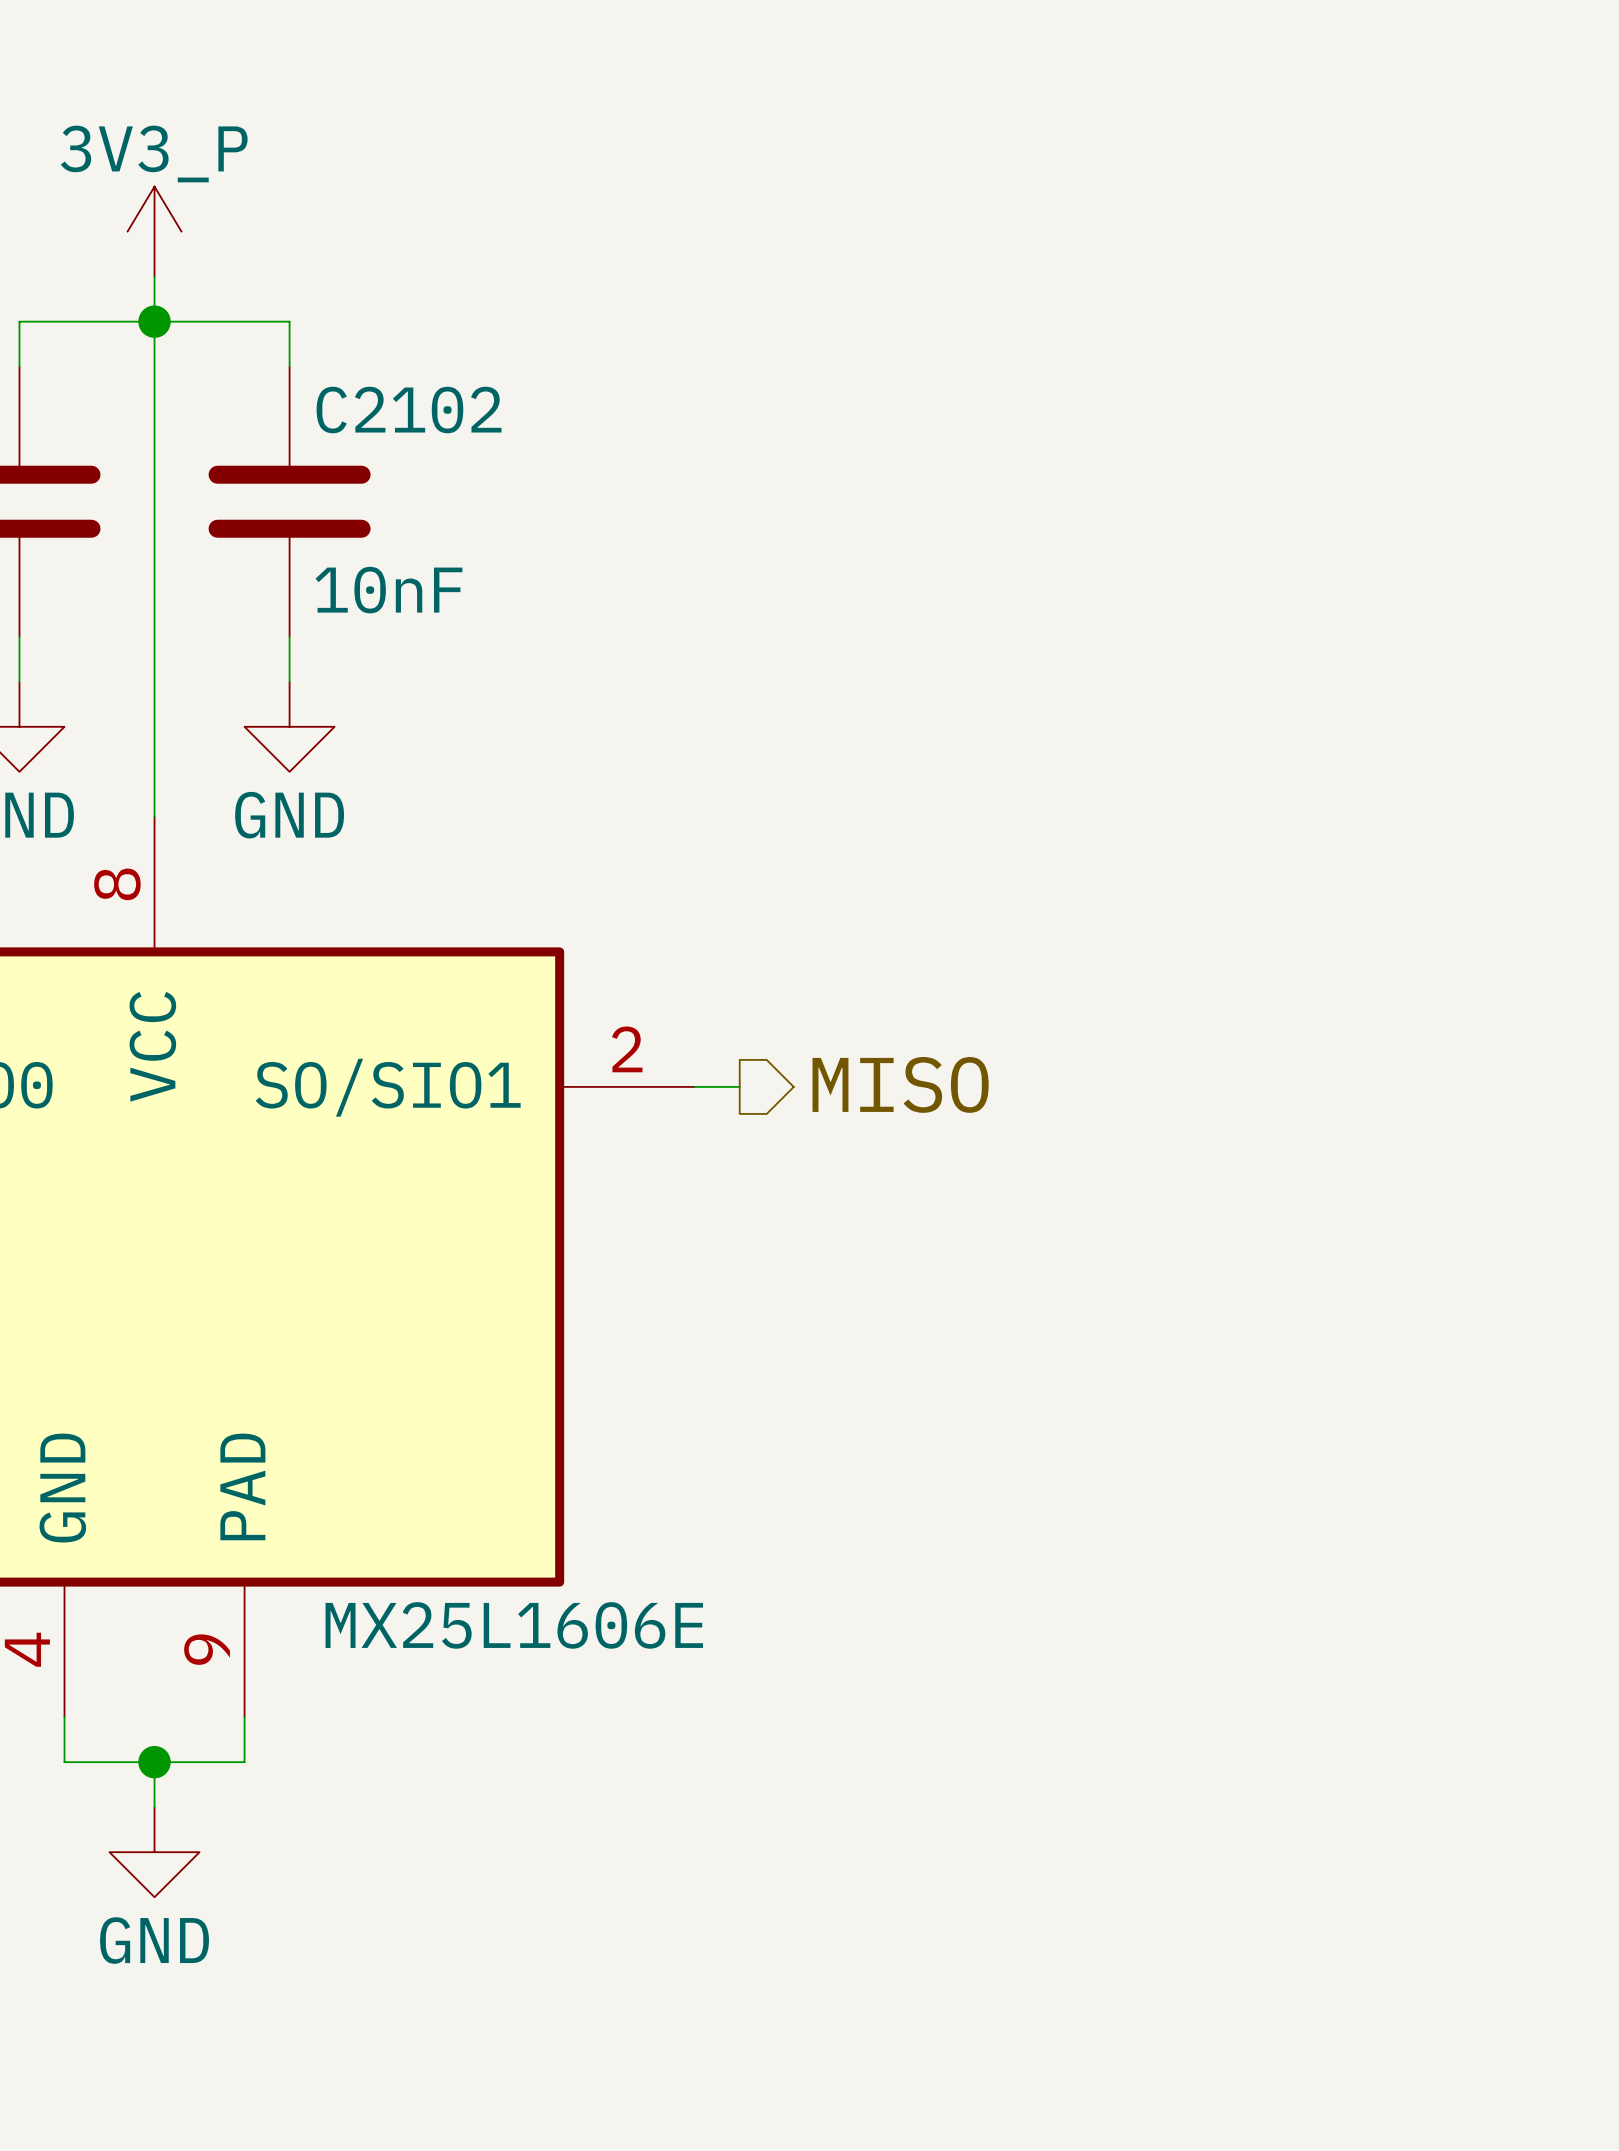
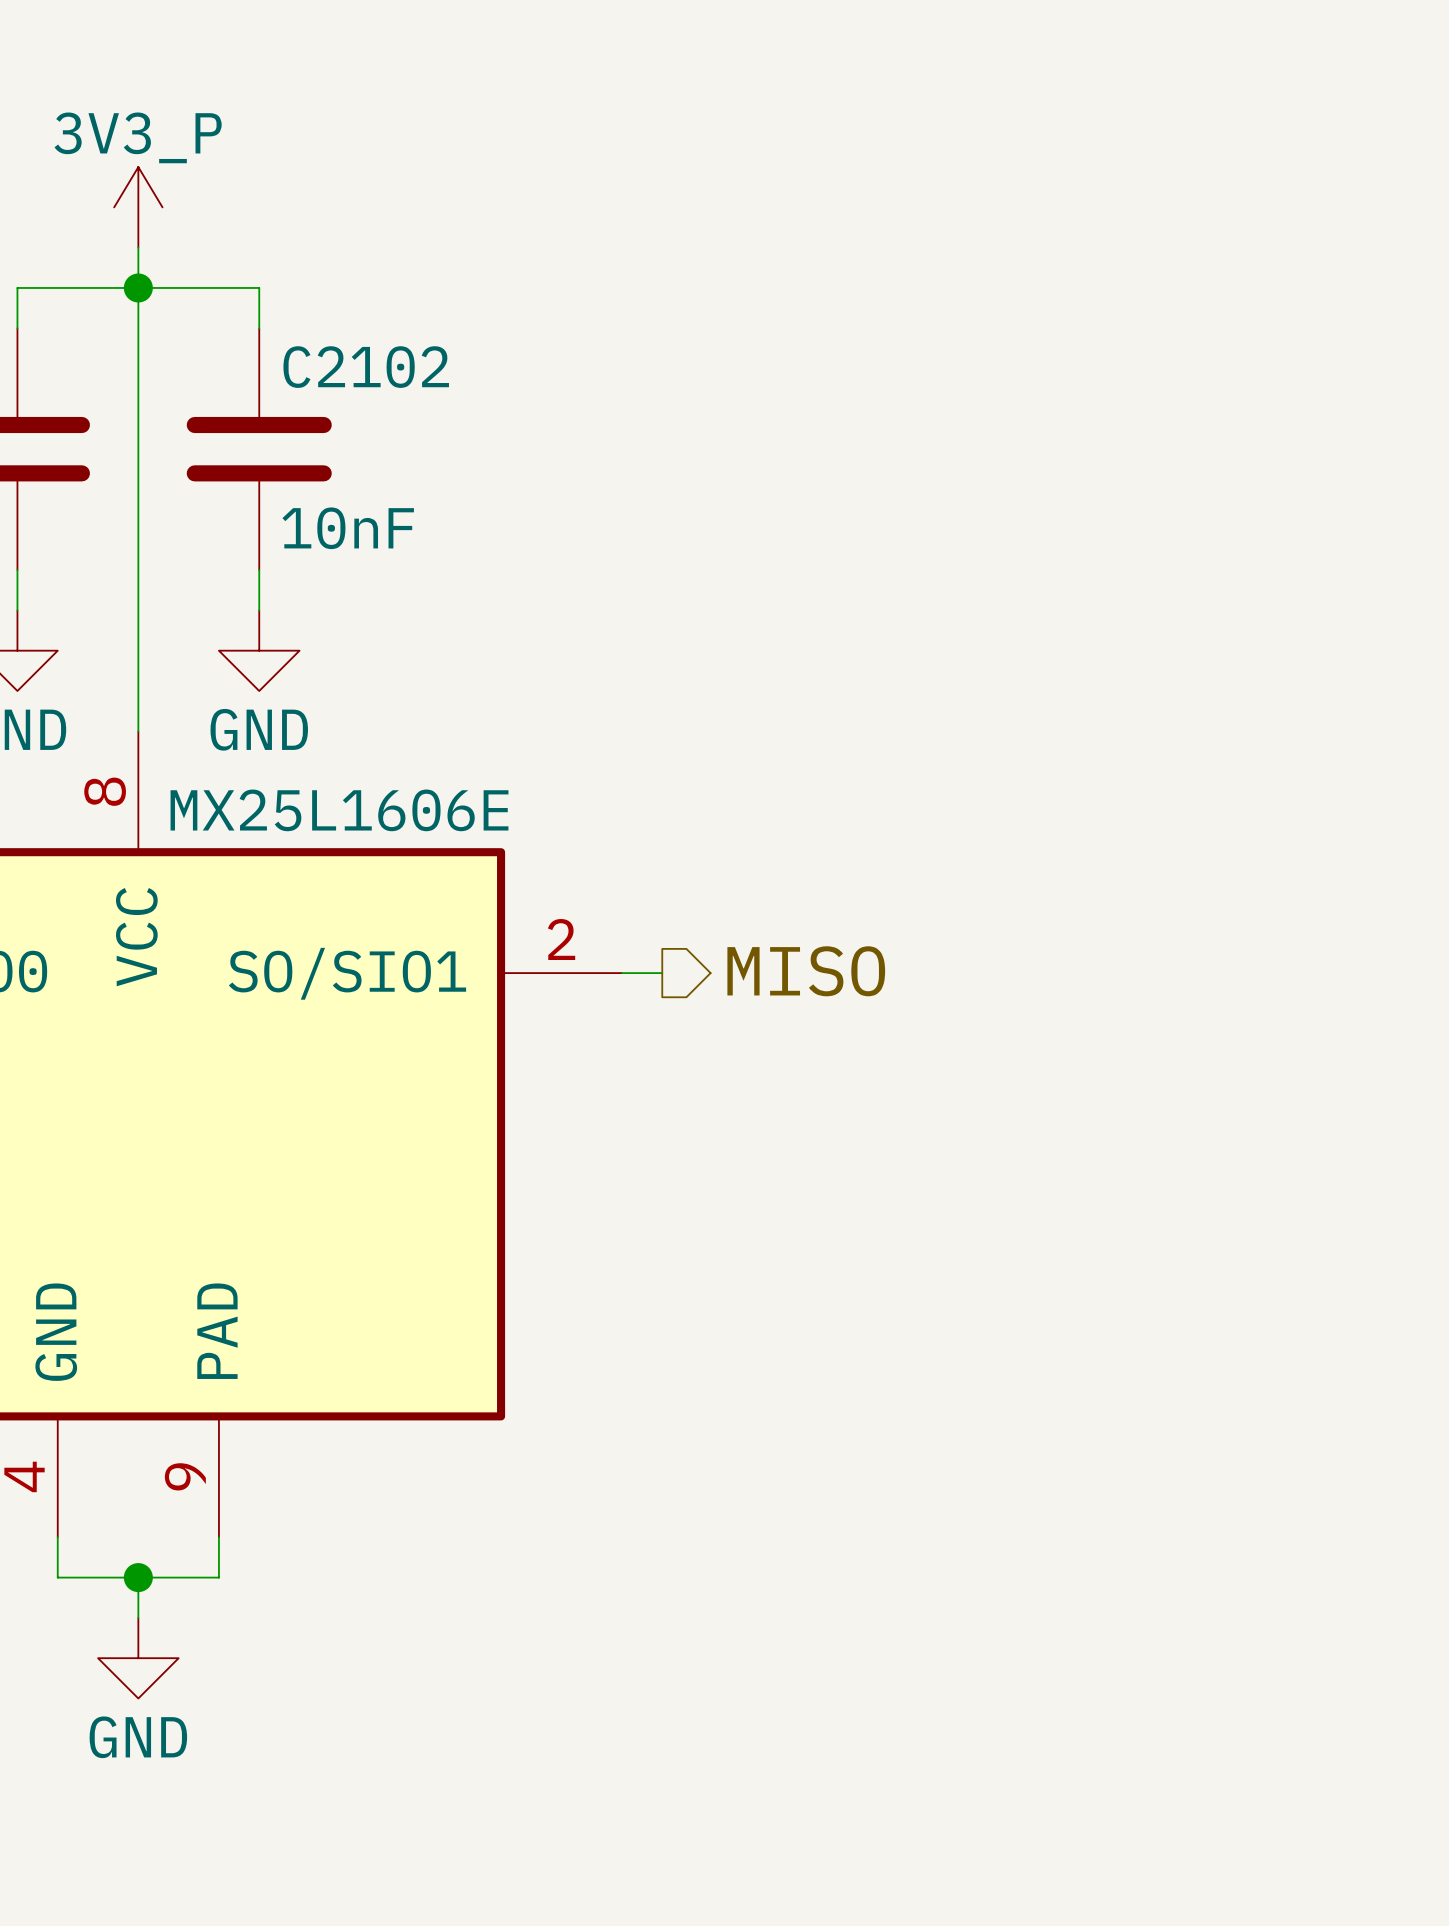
part value position: MX25L1606E (514, 1625) -> MX25L1606E (339, 810)

